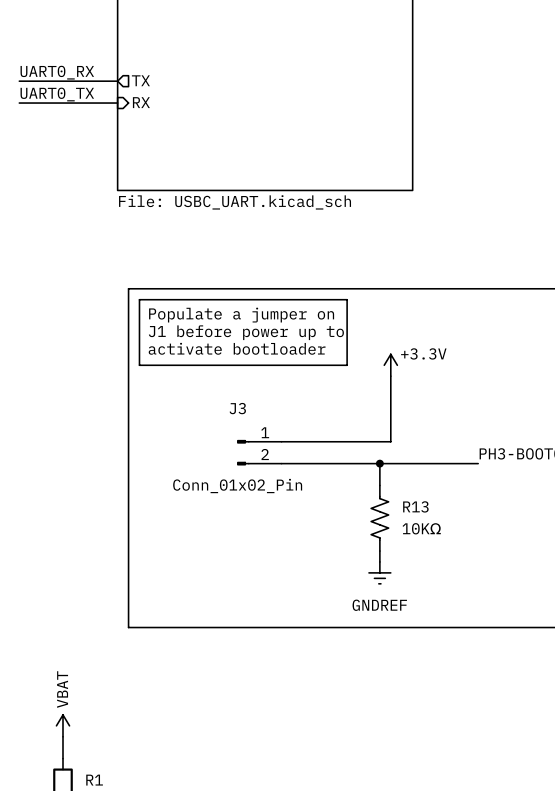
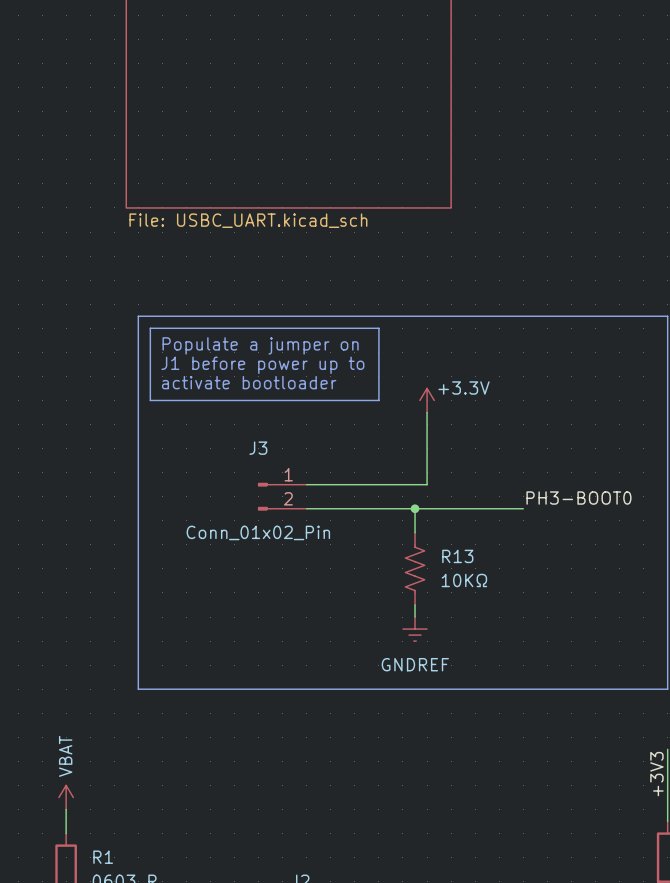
label: UART0_RX (57, 72) -> none
sheet pin: TX (140, 80) -> none
wire: (19, 81) (117, 81) -> none
label: UART0_TX (57, 94) -> none
sheet pin: RX (141, 102) -> none
wire: (19, 103) (117, 103) -> none

